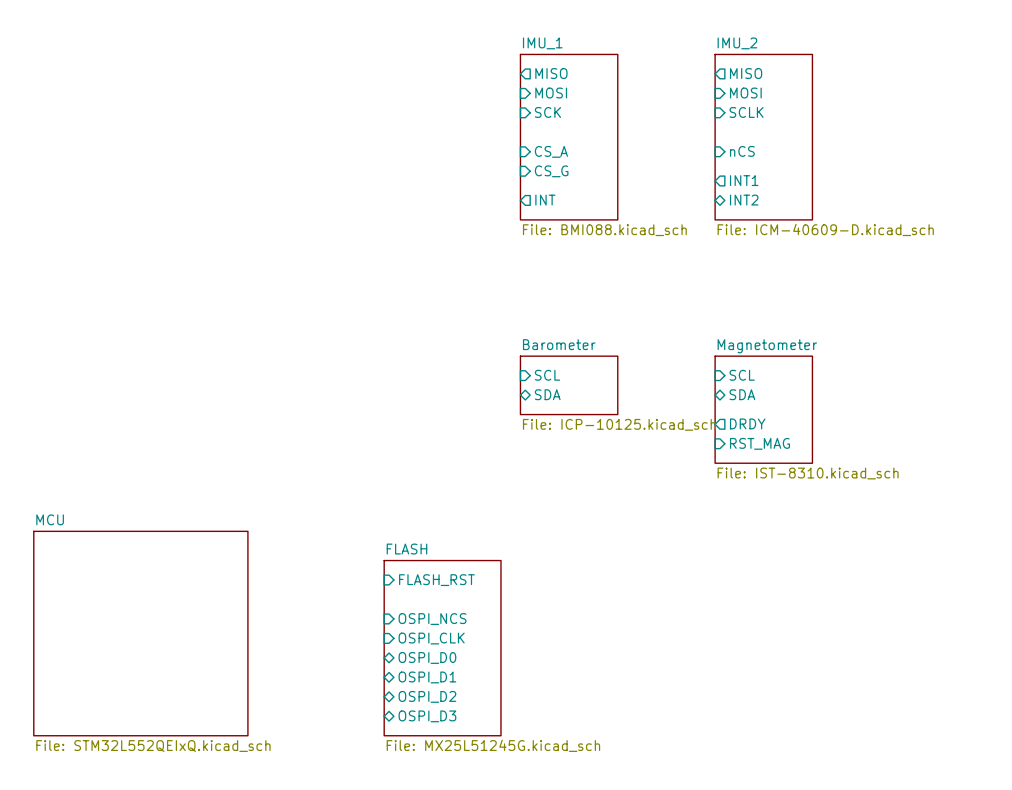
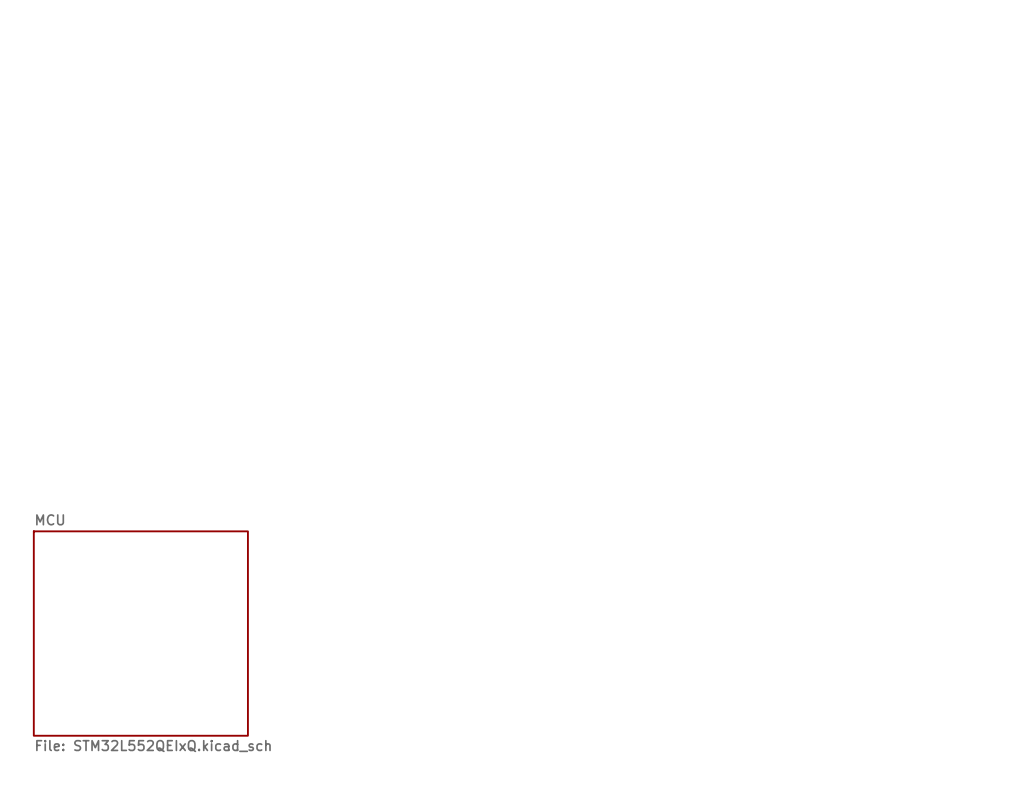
sheet pin: MISO (551, 73) -> none
sheet pin: MISO (746, 73) -> none
sheet pin: MOSI (551, 93) -> none
sheet pin: MOSI (745, 93) -> none
sheet pin: SCK (547, 112) -> none
sheet pin: SCLK (746, 112) -> none
sheet IMU_1: File: BMI088.kicad_sch (569, 137) -> none
sheet IMU_2: File: ICM-40609-D.kicad_sch (763, 137) -> none
sheet pin: CS_A (551, 151) -> none
sheet pin: nCS (742, 151) -> none
sheet pin: CS_G (551, 171) -> none
sheet pin: INT1 (744, 180) -> none
sheet pin: INT (545, 200) -> none
sheet pin: INT2 (744, 200) -> none
sheet pin: SCL (547, 375) -> none
sheet pin: SCL (742, 375) -> none
sheet Barometer: File: ICP-10125.kicad_sch (569, 385) -> none
sheet pin: SDA (547, 394) -> none
sheet pin: SDA (742, 394) -> none
sheet Magnetometer: File: IST-8310.kicad_sch (763, 409) -> none
sheet pin: DRDY (747, 423) -> none
sheet pin: RST_MAG (759, 443) -> none
sheet pin: FLASH_RST (436, 580) -> none
sheet pin: OSPI_NCS (432, 619) -> none
sheet pin: OSPI_CLK (431, 638) -> none
sheet FLASH: File: MX25L51245G.kicad_sch (442, 648) -> none
sheet pin: OSPI_D0 (427, 657) -> none
sheet pin: OSPI_D1 (427, 677) -> none
sheet pin: OSPI_D2 (427, 696) -> none
sheet pin: OSPI_D3 (427, 716) -> none

